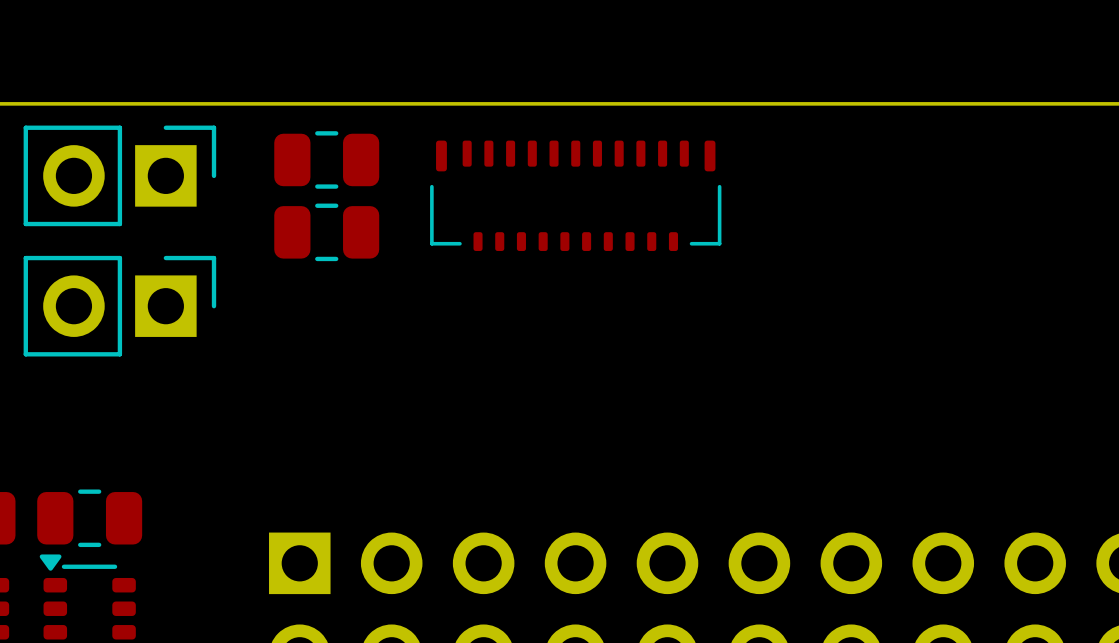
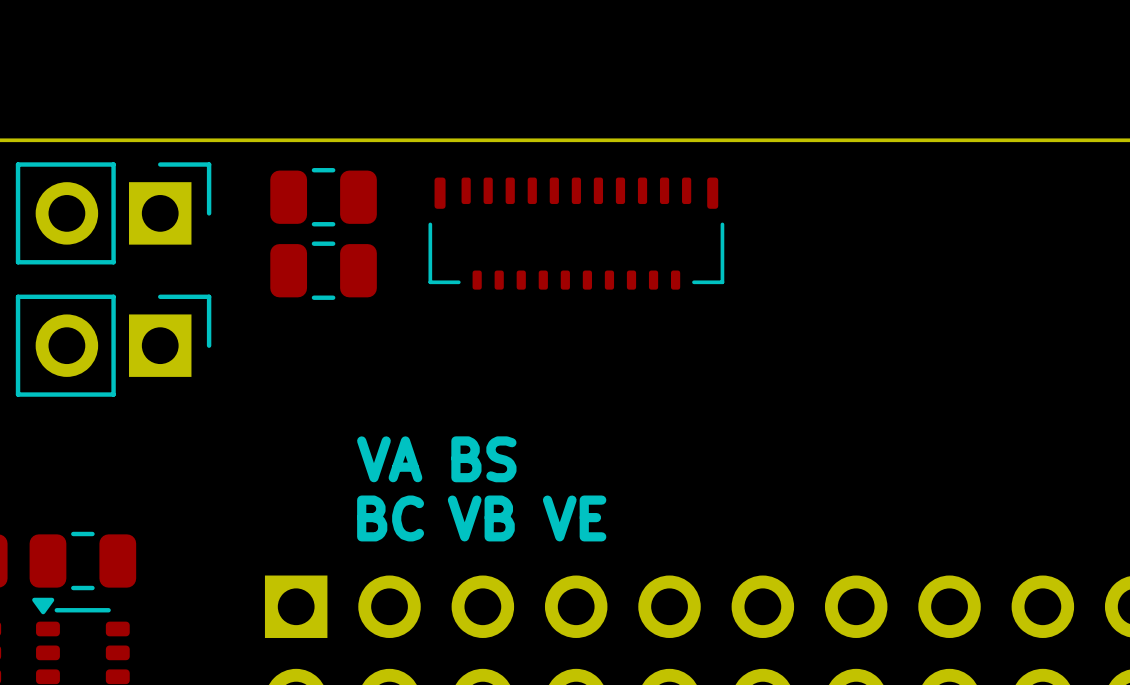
text: none -> VA (389, 459)
text: none -> BS (483, 459)
text: none -> BC (390, 518)
text: none -> VB (481, 518)
text: none -> VE (574, 518)

